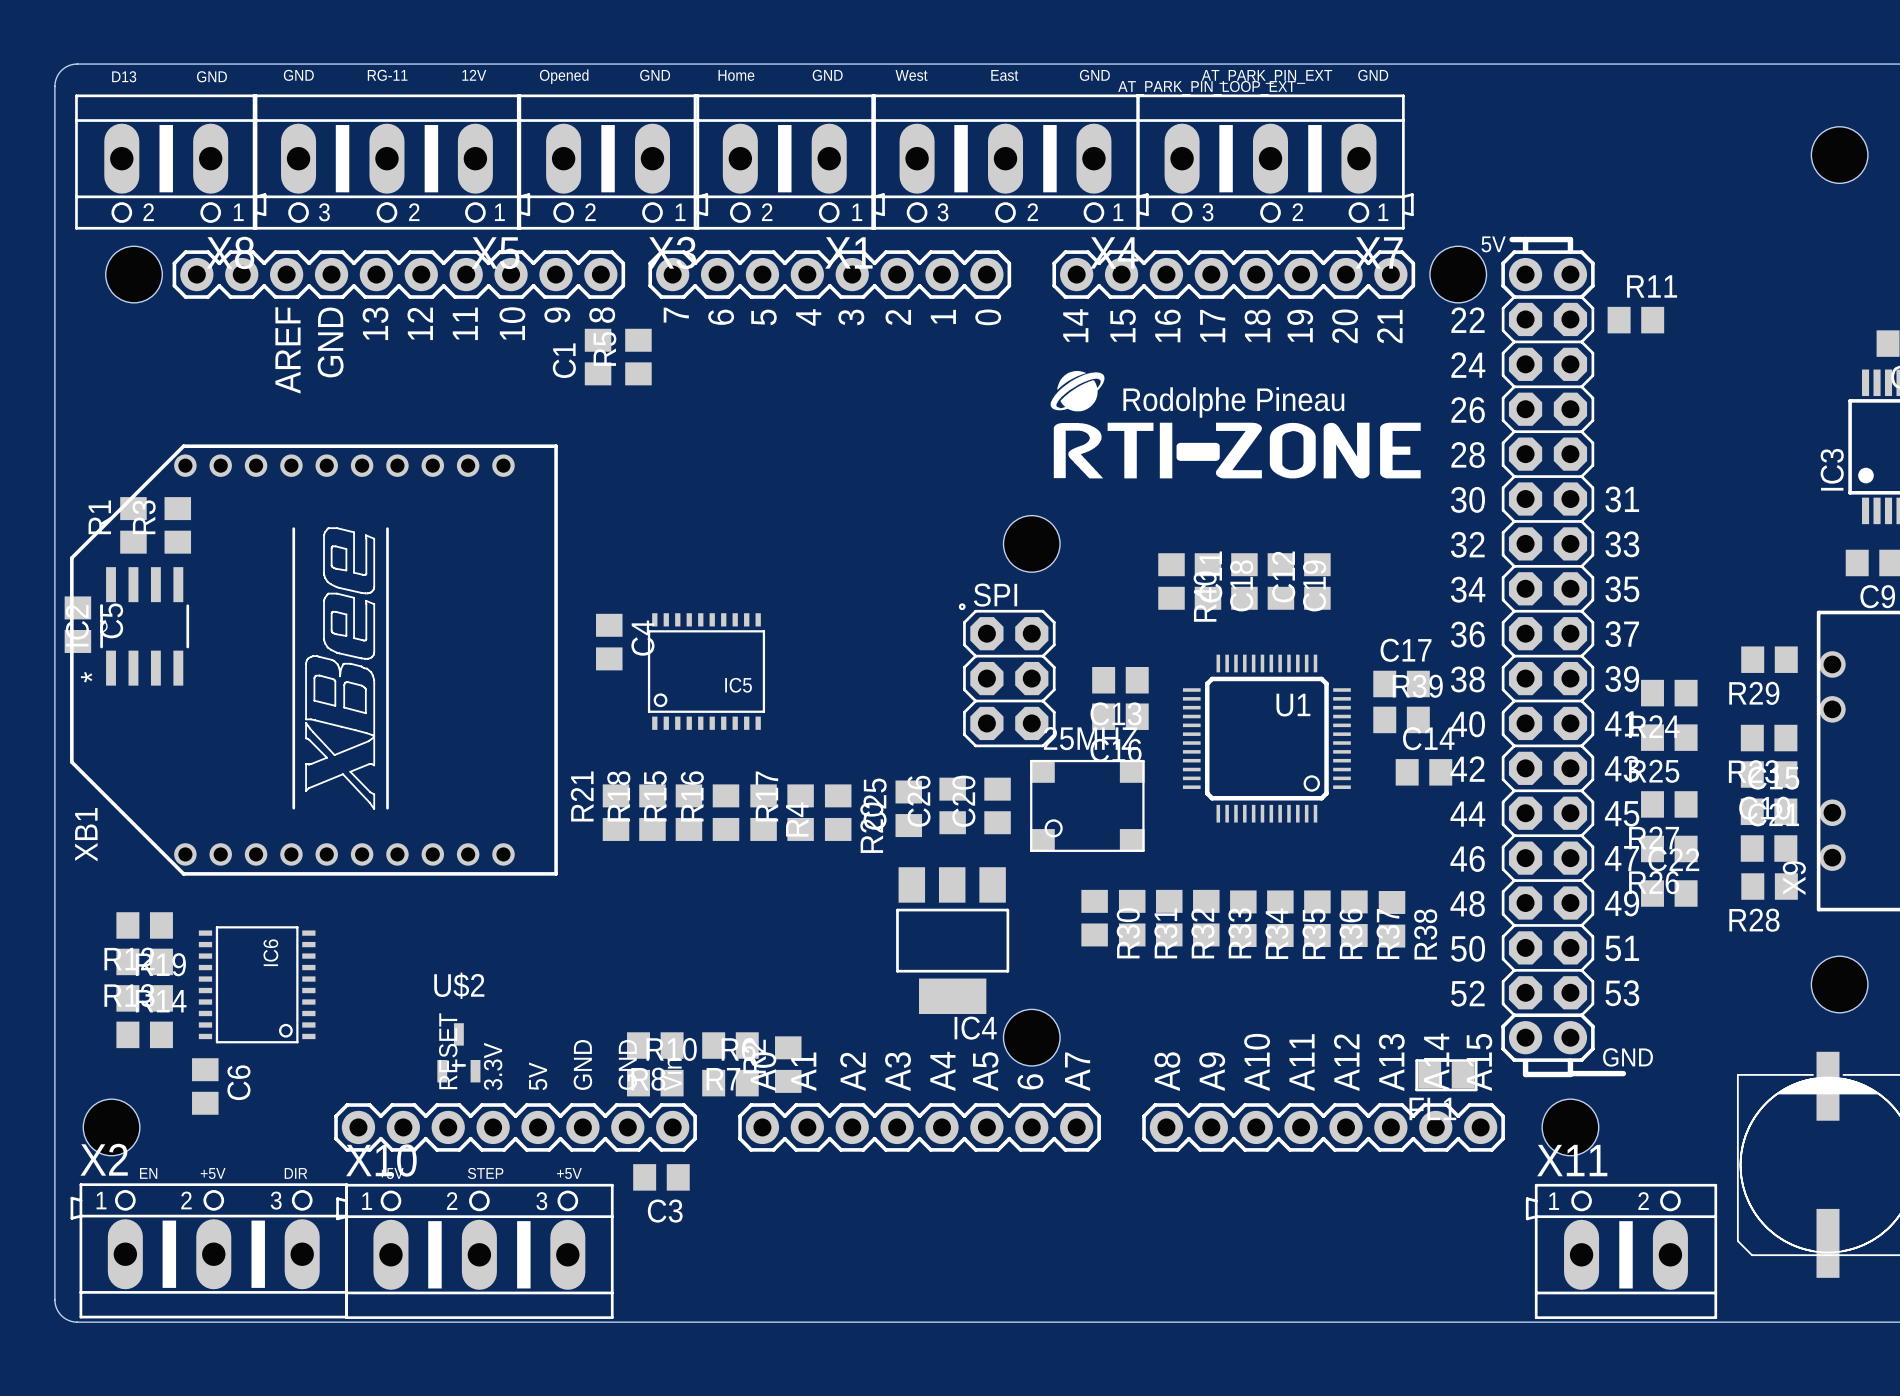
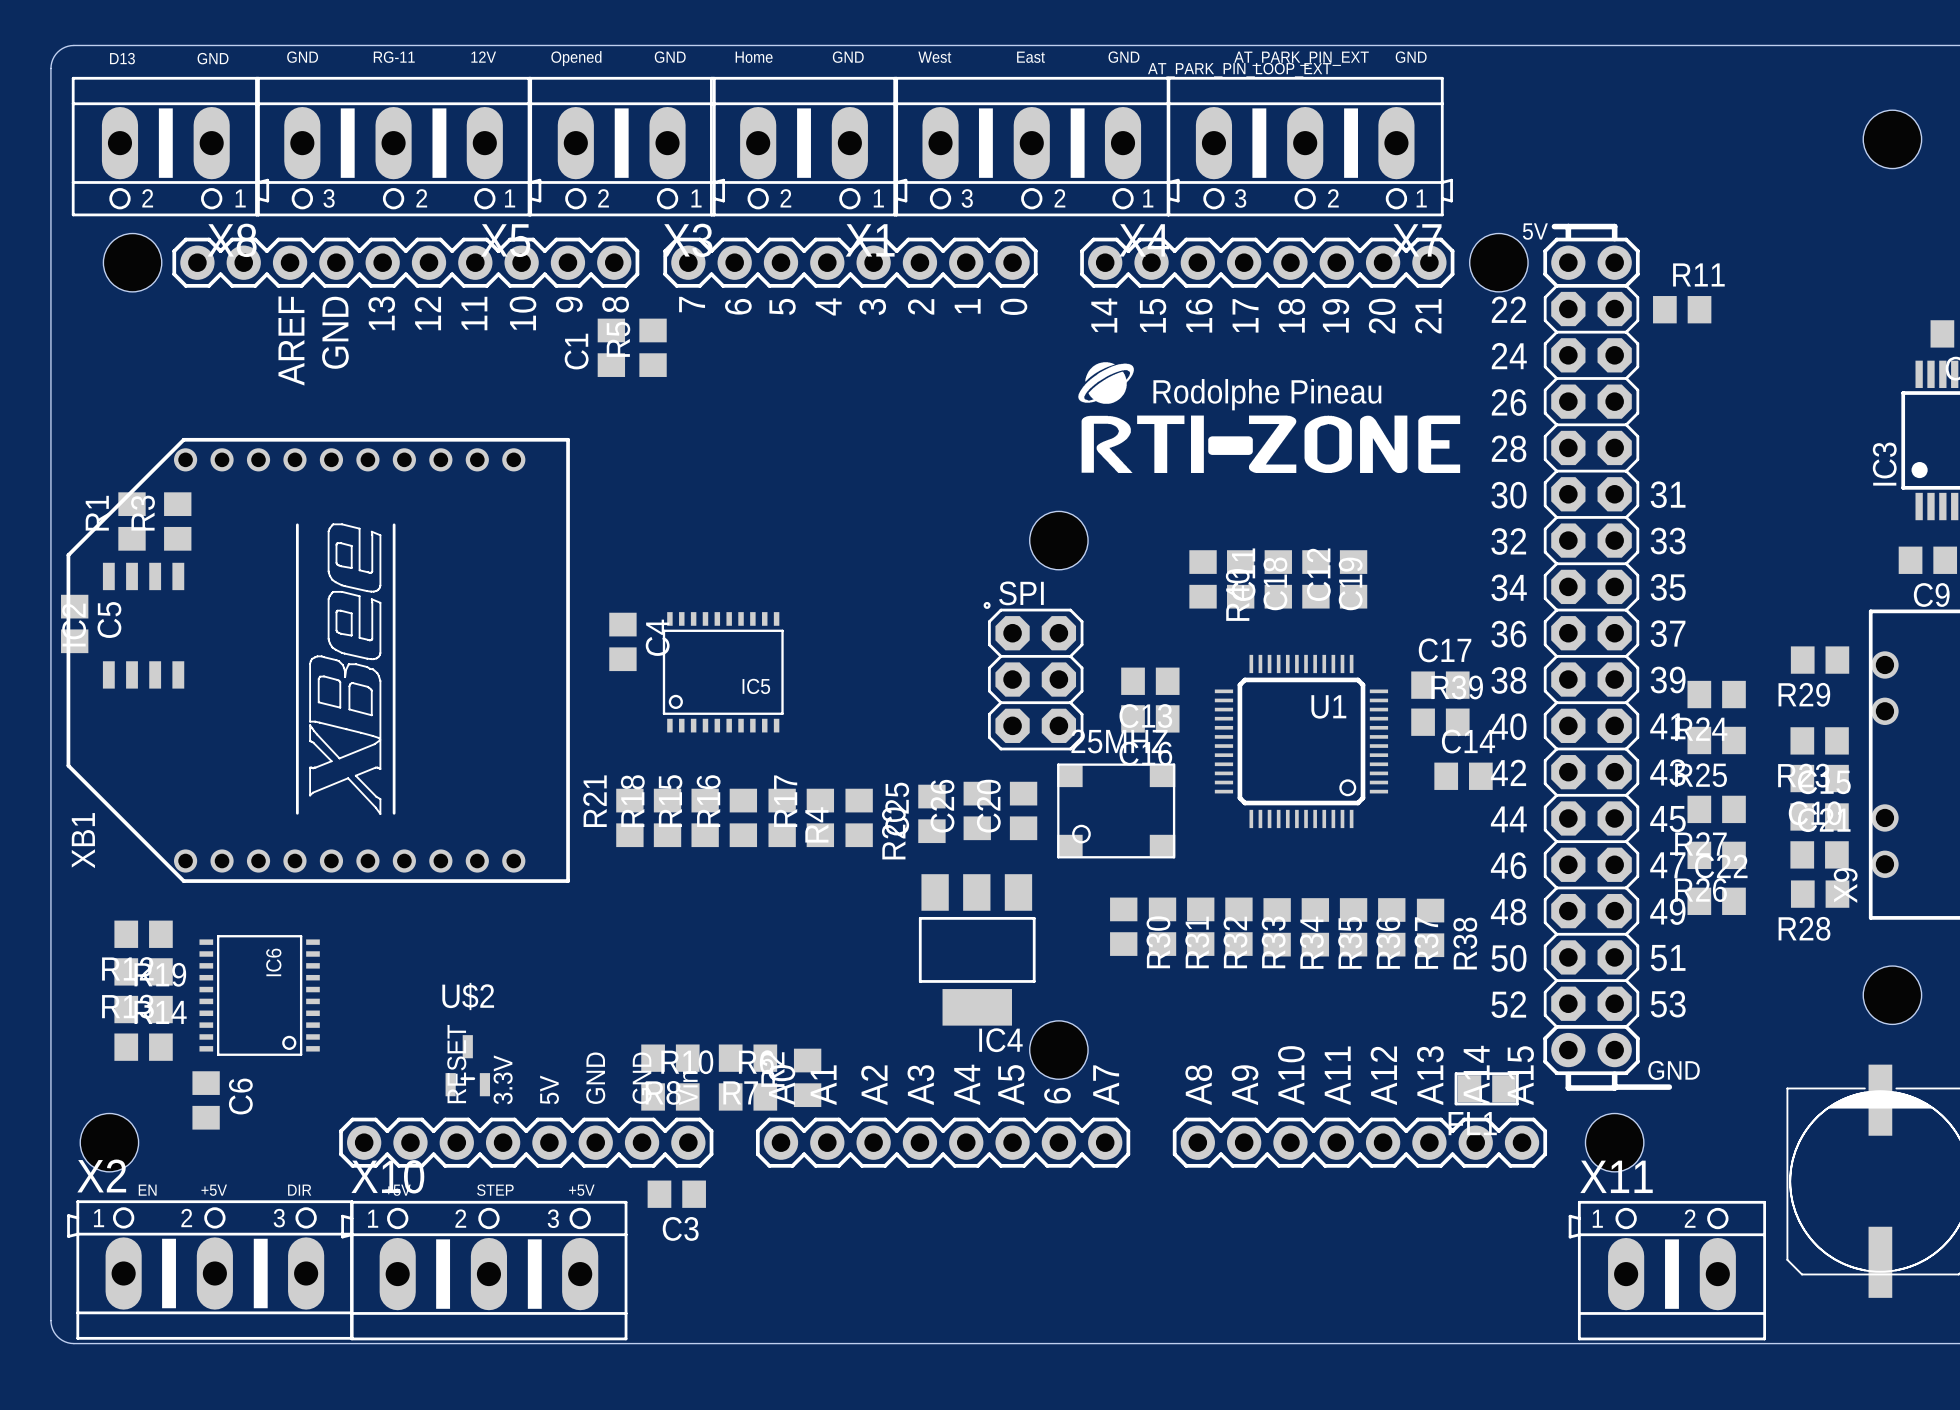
part footprint: [100, 567, 190, 686] -> [102, 562, 185, 689]

